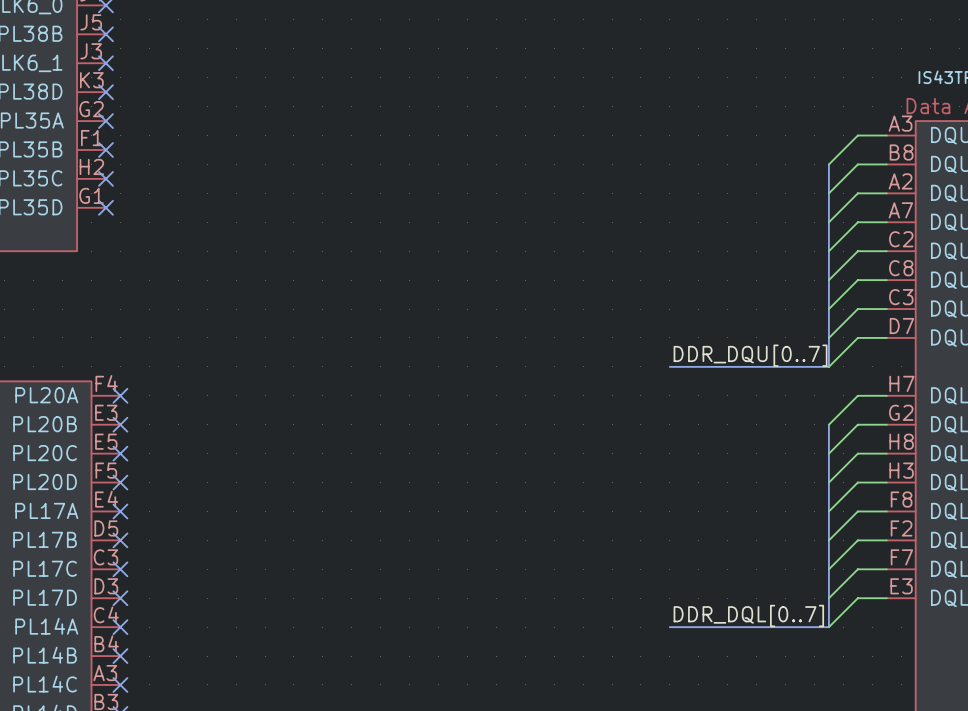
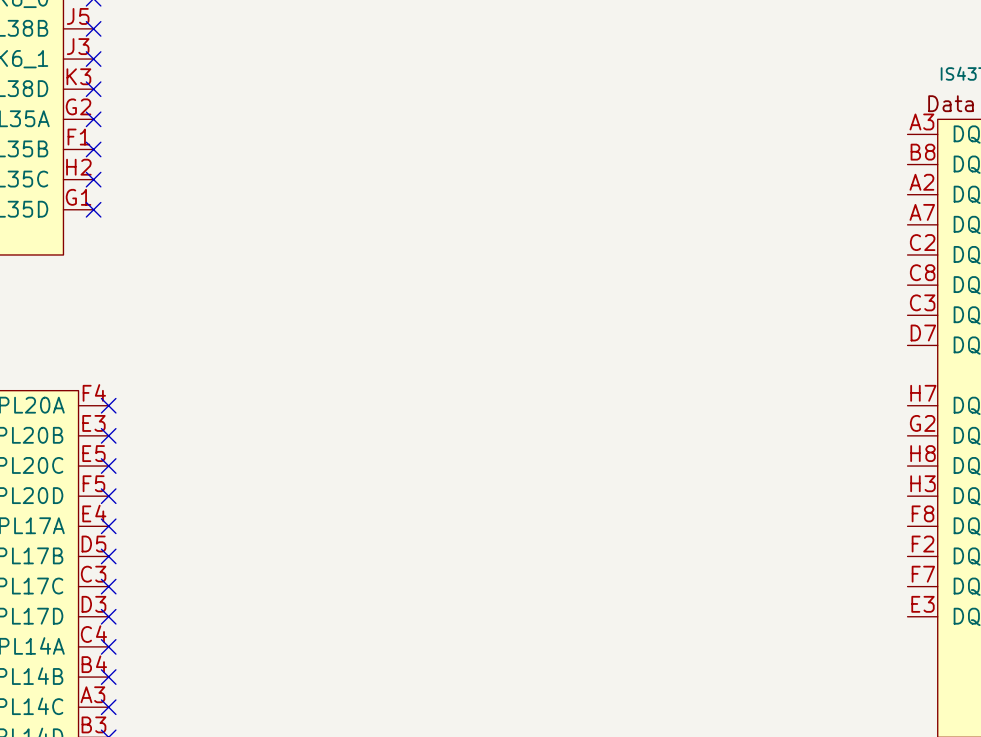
wire: (886, 135) (857, 135) (828, 164) -> none
bus: (828, 164) (828, 366) (669, 366) -> none
wire: (886, 164) (857, 164) (828, 193) -> none
wire: (886, 193) (857, 193) (828, 222) -> none
wire: (886, 222) (857, 222) (828, 251) -> none
wire: (886, 251) (857, 251) (828, 280) -> none
wire: (886, 280) (857, 280) (828, 309) -> none
wire: (886, 309) (857, 309) (828, 337) -> none
wire: (886, 337) (857, 337) (828, 366) -> none
label: DDR_DQU[0..7] (750, 355) -> none
wire: (886, 395) (857, 395) (828, 424) -> none
bus: (828, 424) (828, 627) (669, 627) -> none
wire: (886, 424) (857, 424) (828, 453) -> none
wire: (886, 453) (857, 453) (828, 482) -> none
wire: (886, 482) (857, 482) (828, 511) -> none
wire: (886, 511) (857, 511) (828, 540) -> none
wire: (886, 540) (857, 540) (828, 569) -> none
wire: (886, 569) (857, 569) (828, 598) -> none
wire: (886, 598) (857, 598) (828, 627) -> none
label: DDR_DQL[0..7] (748, 615) -> none

